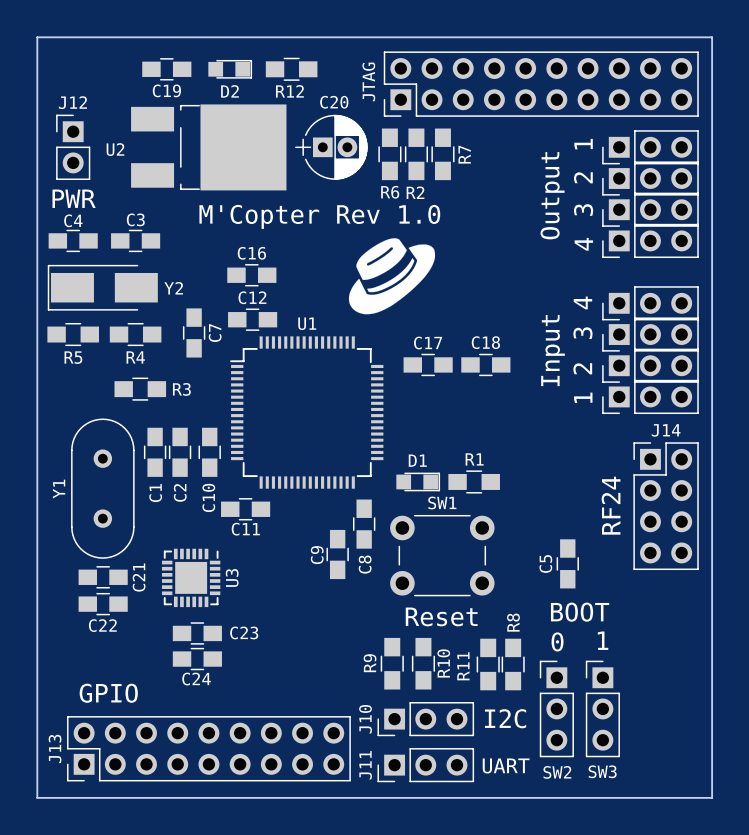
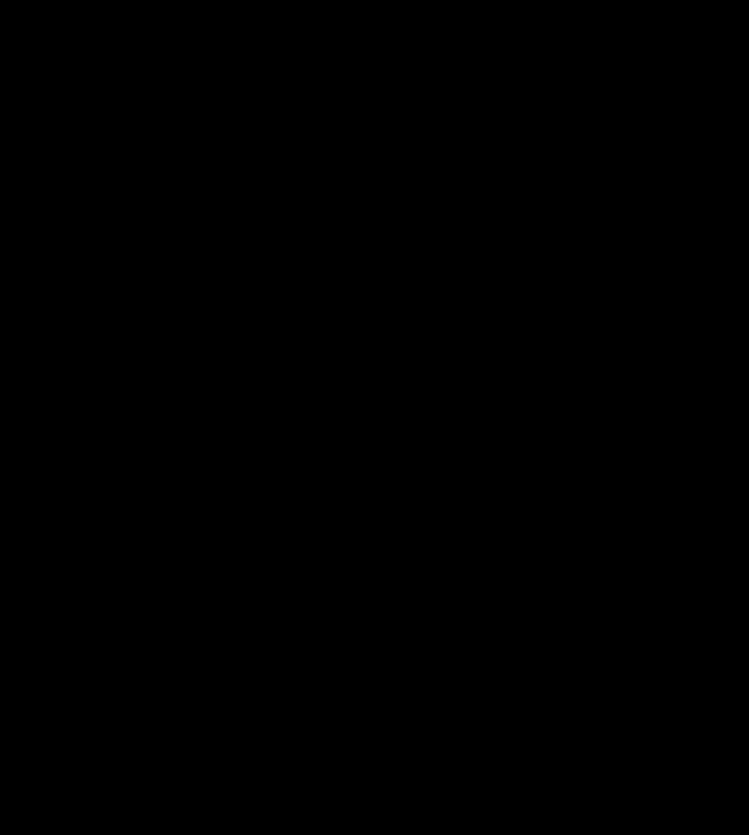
board edge: (37, 37) (712, 37) (712, 797) (37, 797) (37, 37) -> none
C19: (166, 69) -> none
D2: (230, 69) -> none
R12: (291, 69) -> none
JTAG: (541, 84) -> none
text: 1 (583, 144) -> none
J12: (73, 147) -> none
U2: (208, 147) -> none
C20: (331, 147) -> none
part: (650, 147) -> none
R6: (389, 154) -> none
R2: (416, 154) -> none
R7: (442, 154) -> none
text: 2 (583, 177) -> none
part: (650, 178) -> none
text: Output (552, 195) -> none
text: PWR (74, 198) -> none
part: (650, 209) -> none
text: 3 (583, 210) -> none
text: M'Copter Rev 1.0 (319, 216) -> none
drawing: [348, 238, 436, 315] -> none
C4: (73, 240) -> none
C3: (135, 240) -> none
part: (650, 240) -> none
text: 4 (583, 244) -> none
C16: (251, 275) -> none
Y2: (102, 287) -> none
text: 4 (582, 302) -> none
part: (650, 303) -> none
C12: (252, 319) -> none
C7: (194, 332) -> none
text: 3 (582, 333) -> none
R5: (73, 334) -> none
R4: (135, 334) -> none
part: (650, 334) -> none
text: Input (553, 350) -> none
C17: (428, 364) -> none
C18: (485, 364) -> none
part: (650, 365) -> none
text: 2 (582, 368) -> none
R3: (140, 389) -> none
part: (650, 396) -> none
text: 1 (583, 397) -> none
U1: (306, 412) -> none
C1: (155, 452) -> none
C2: (180, 452) -> none
C10: (209, 452) -> none
D1: (418, 481) -> none
R1: (474, 481) -> none
Y1: (102, 488) -> none
text: RF24 (611, 505) -> none
J14: (666, 506) -> none
C11: (245, 509) -> none
C8: (364, 524) -> none
C9: (337, 554) -> none
SW1: (442, 555) -> none
C5: (567, 563) -> none
C21: (103, 577) -> none
U3: (191, 577) -> none
C22: (103, 604) -> none
text: BOOT (580, 612) -> none
text: Reset (441, 616) -> none
C23: (197, 633) -> none
text: 1 (603, 640) -> none
text: 0 (557, 641) -> none
C24: (197, 659) -> none
R9: (392, 663) -> none
R10: (423, 663) -> none
R11: (488, 664) -> none
R8: (513, 664) -> none
text: GPIO (108, 693) -> none
SW2: (556, 708) -> none
SW3: (602, 708) -> none
text: I2C (505, 718) -> none
J10: (425, 719) -> none
J13: (208, 748) -> none
J11: (425, 765) -> none
text: UART (506, 765) -> none

